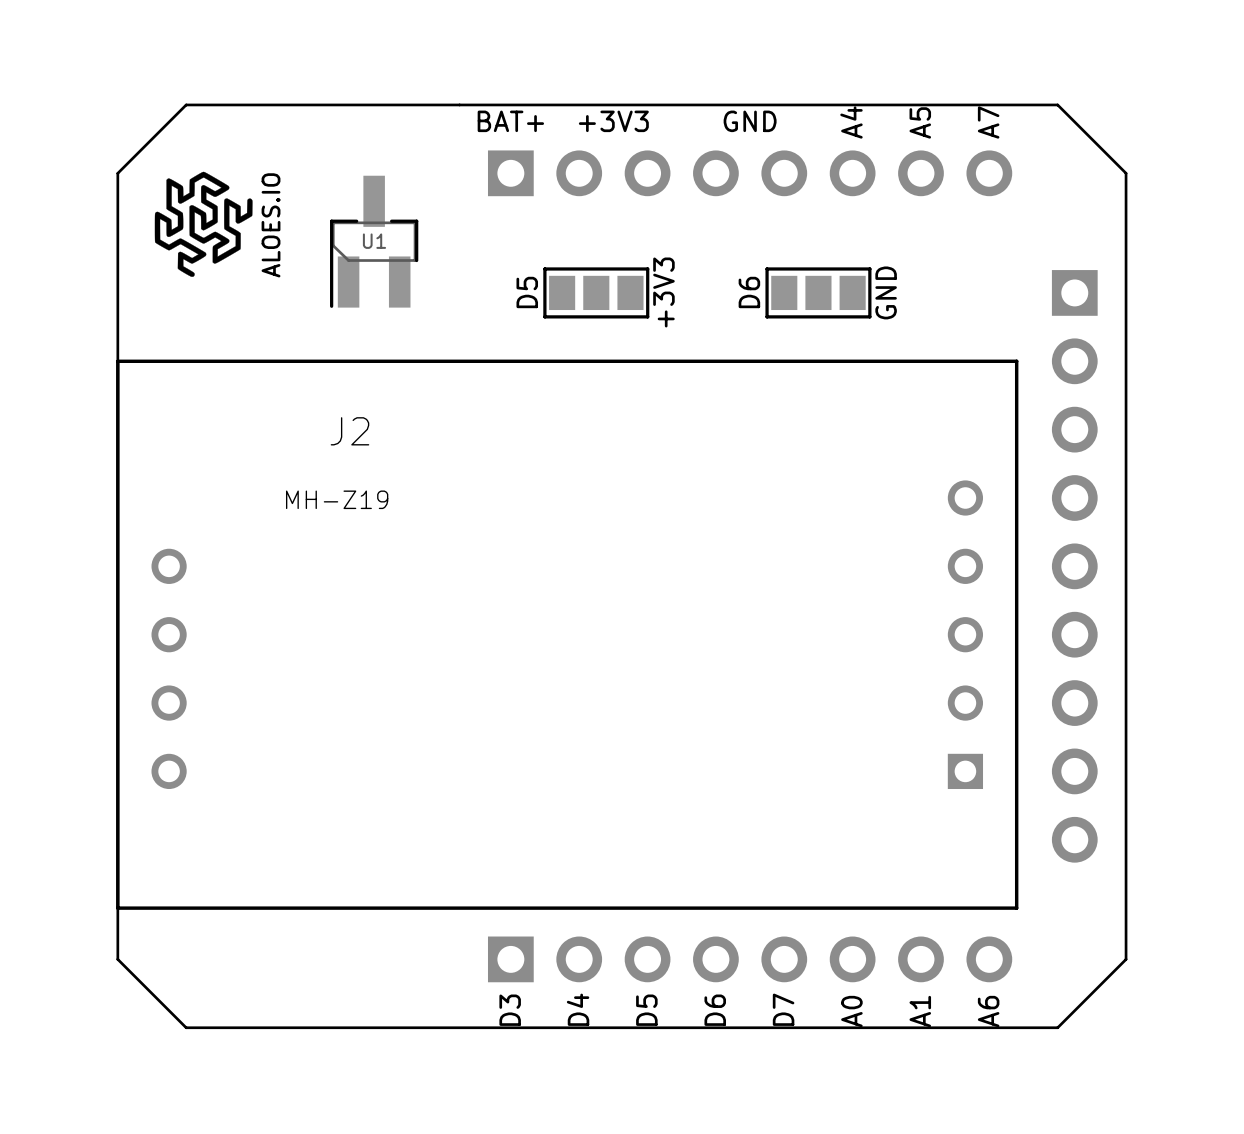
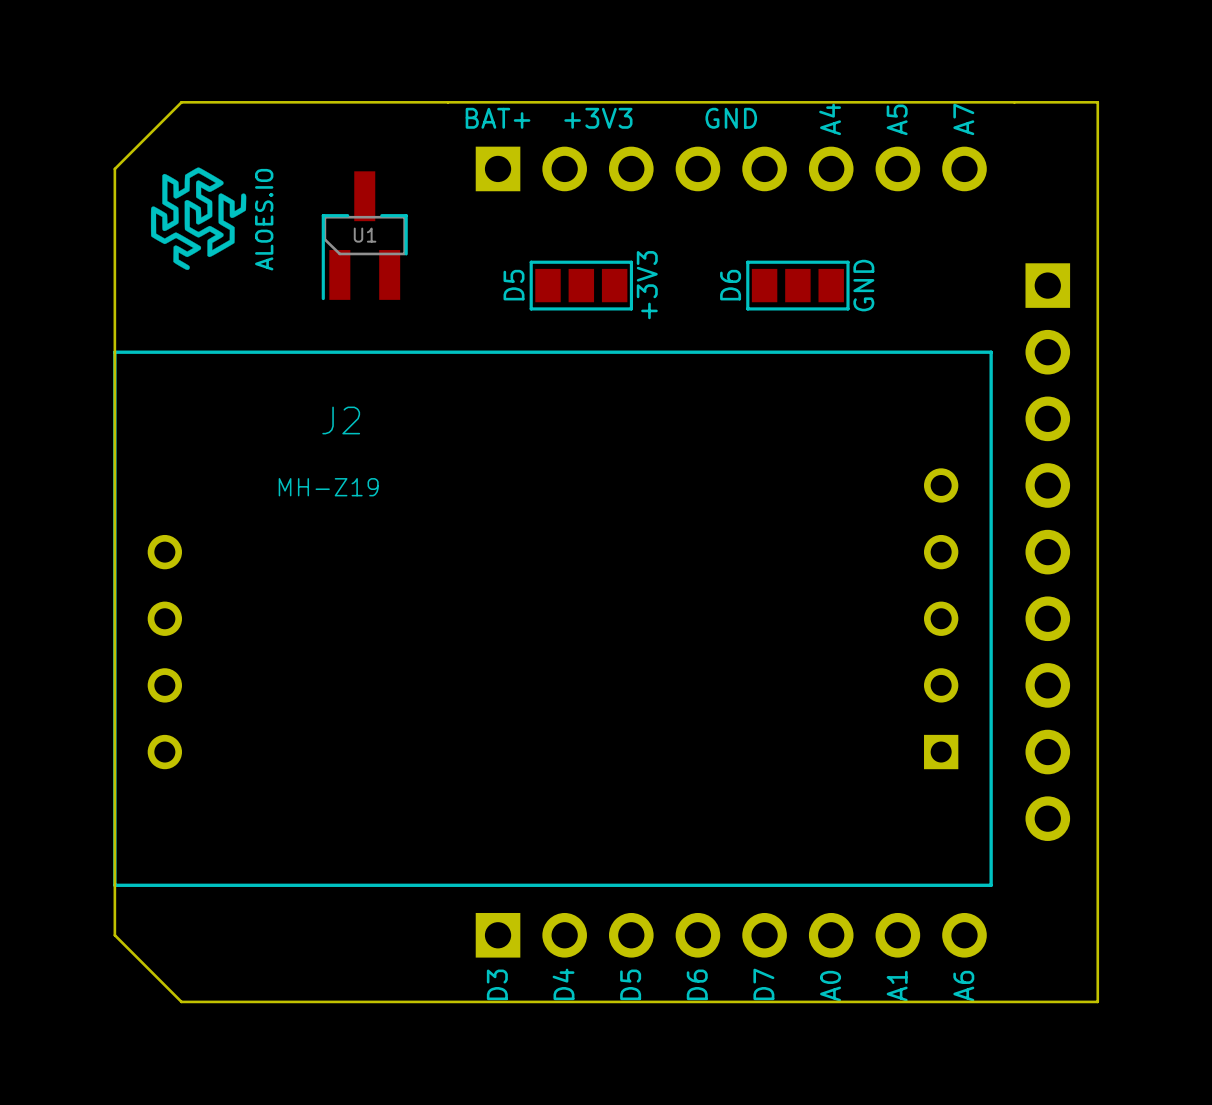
board edge: (1057, 104) (1126, 173) -> (1031, 102) (1097, 102) (1097, 168)
board edge: (1126, 959) (1057, 1027) -> (1097, 935) (1097, 1001) (1031, 1001)

